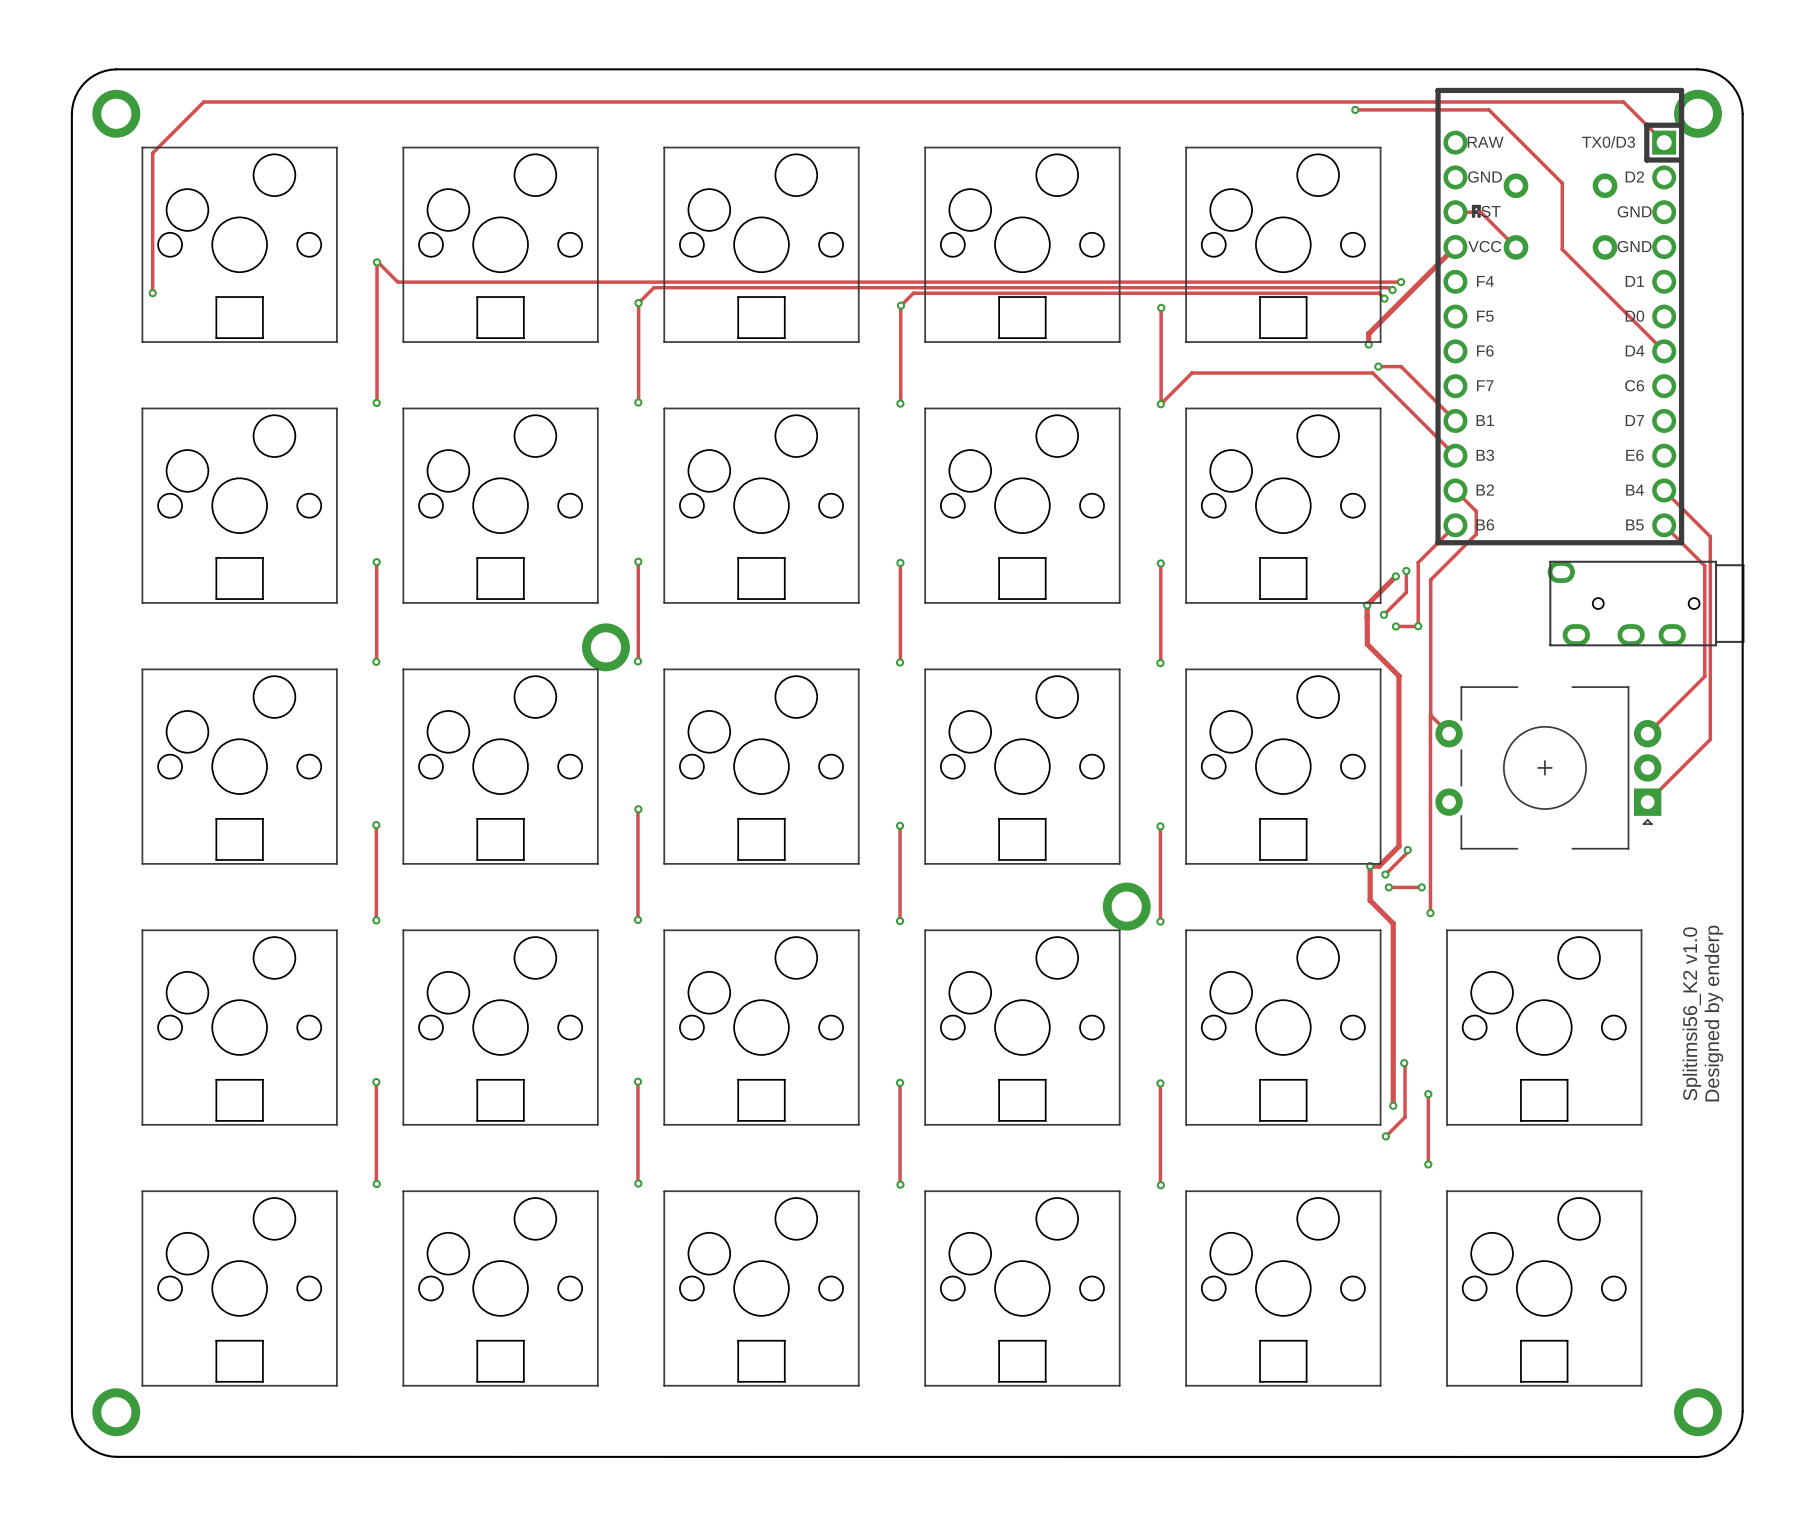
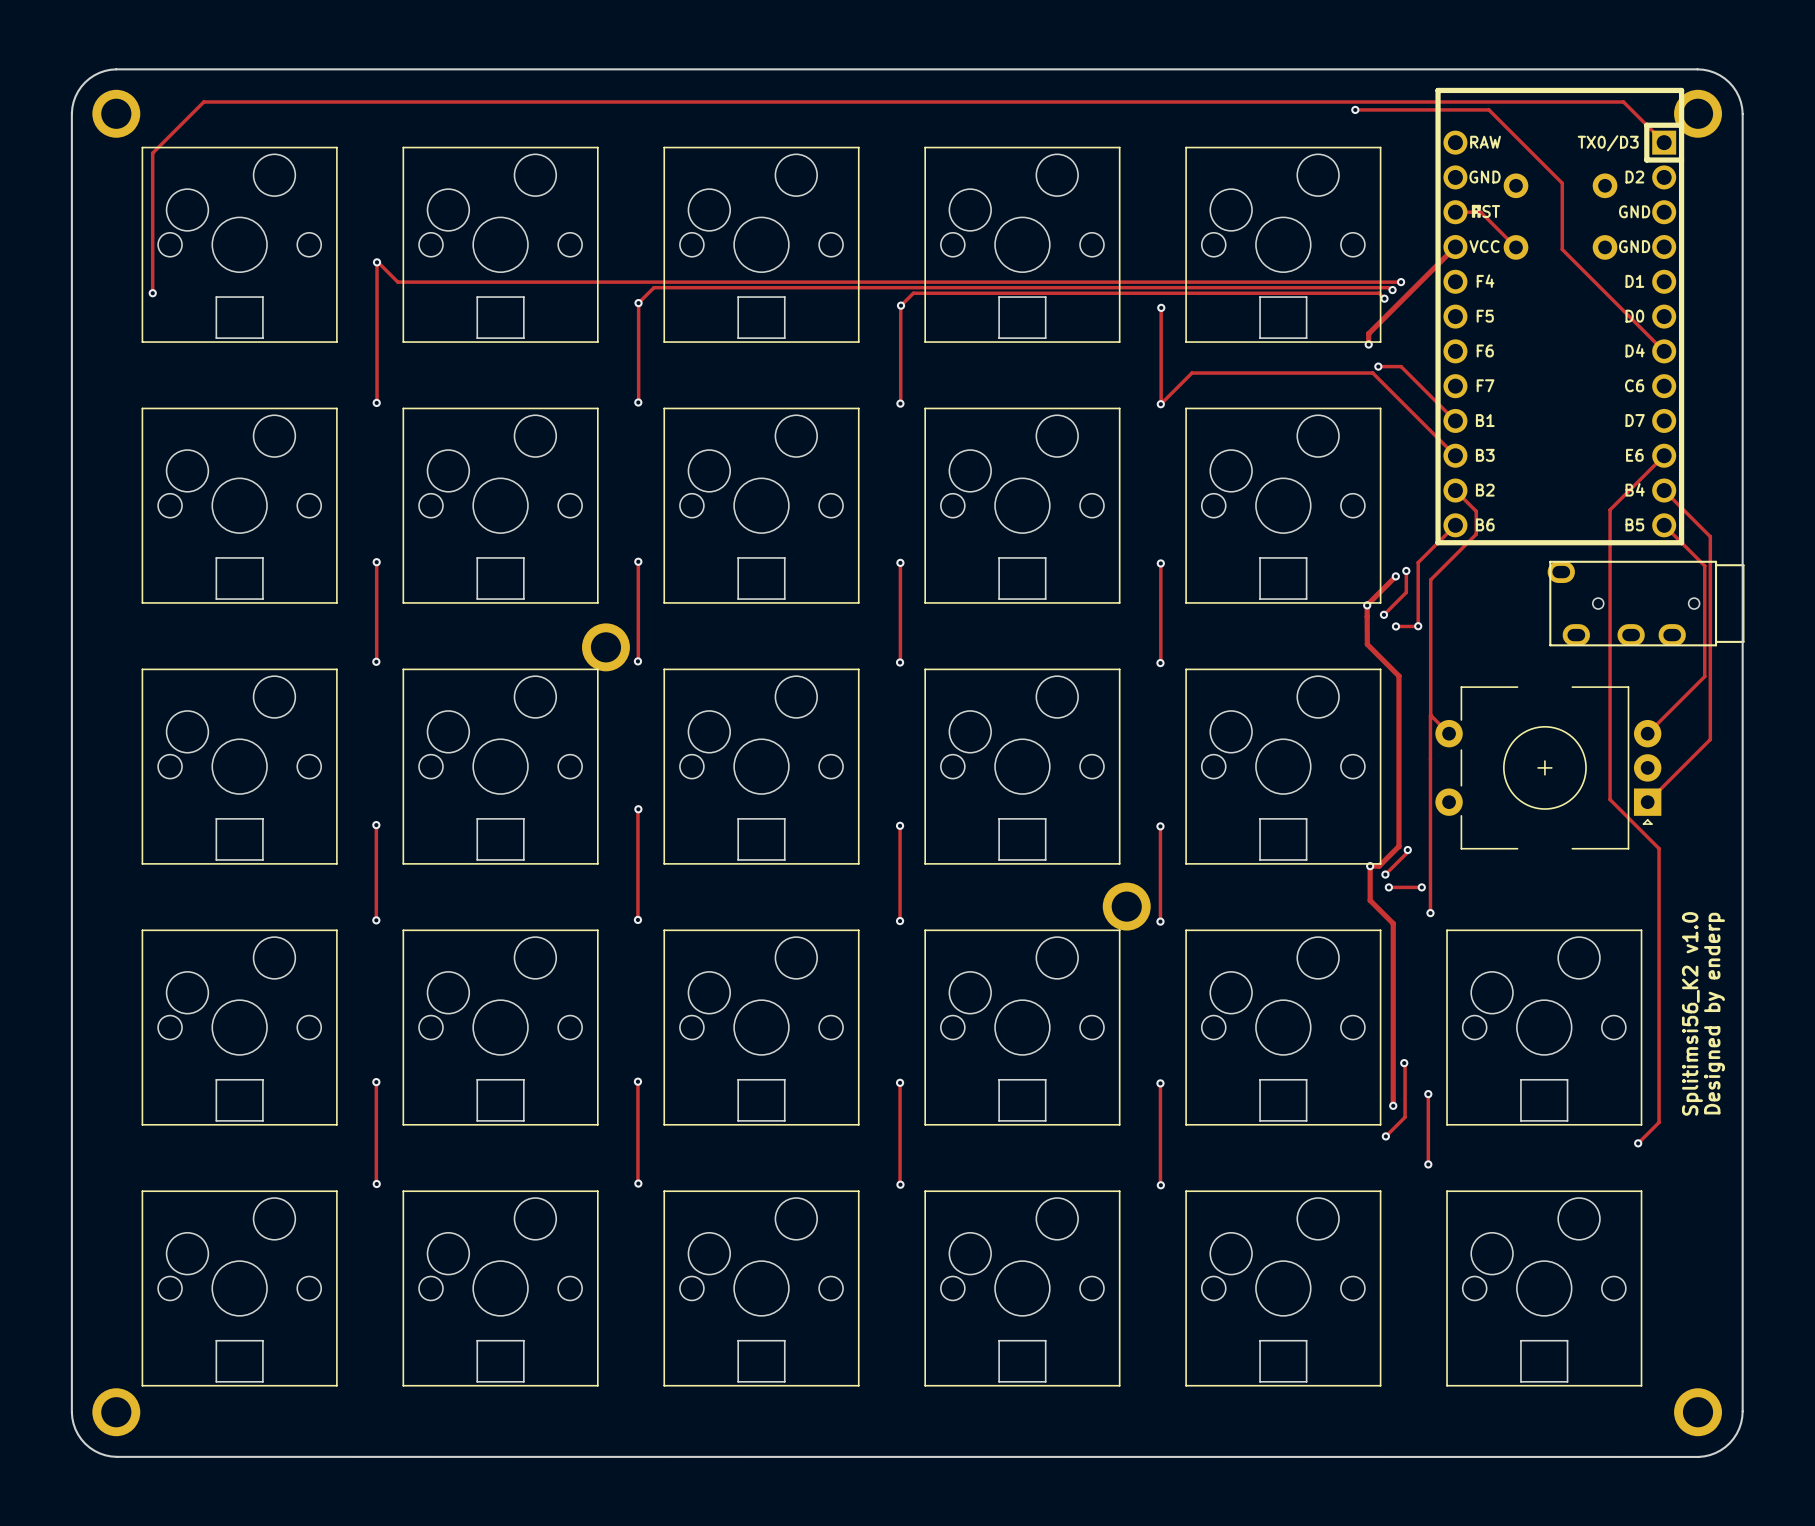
track: none -> (1664, 455) (1610, 509) (1610, 799) (1659, 848) (1659, 1122) (1638, 1143)
via: none -> (1638, 1143)

